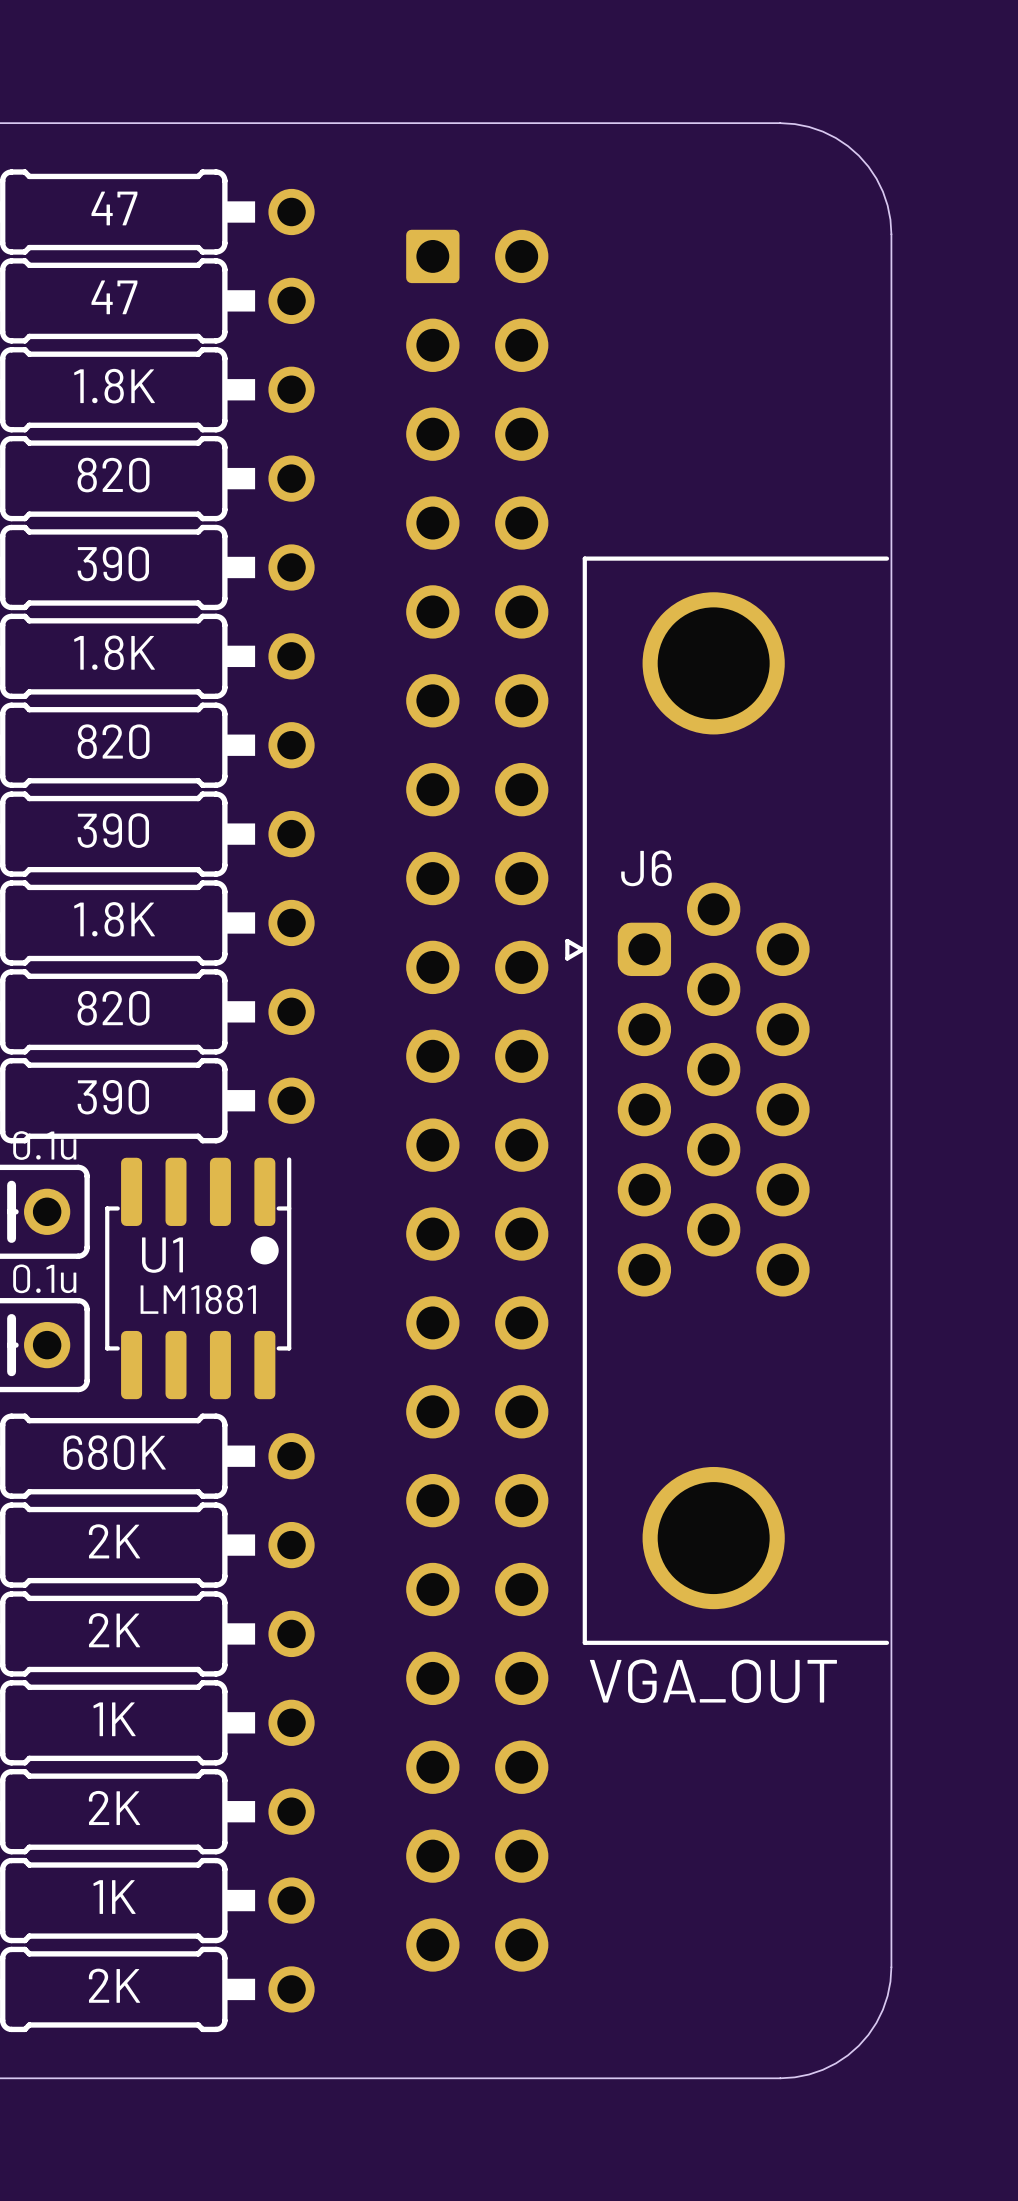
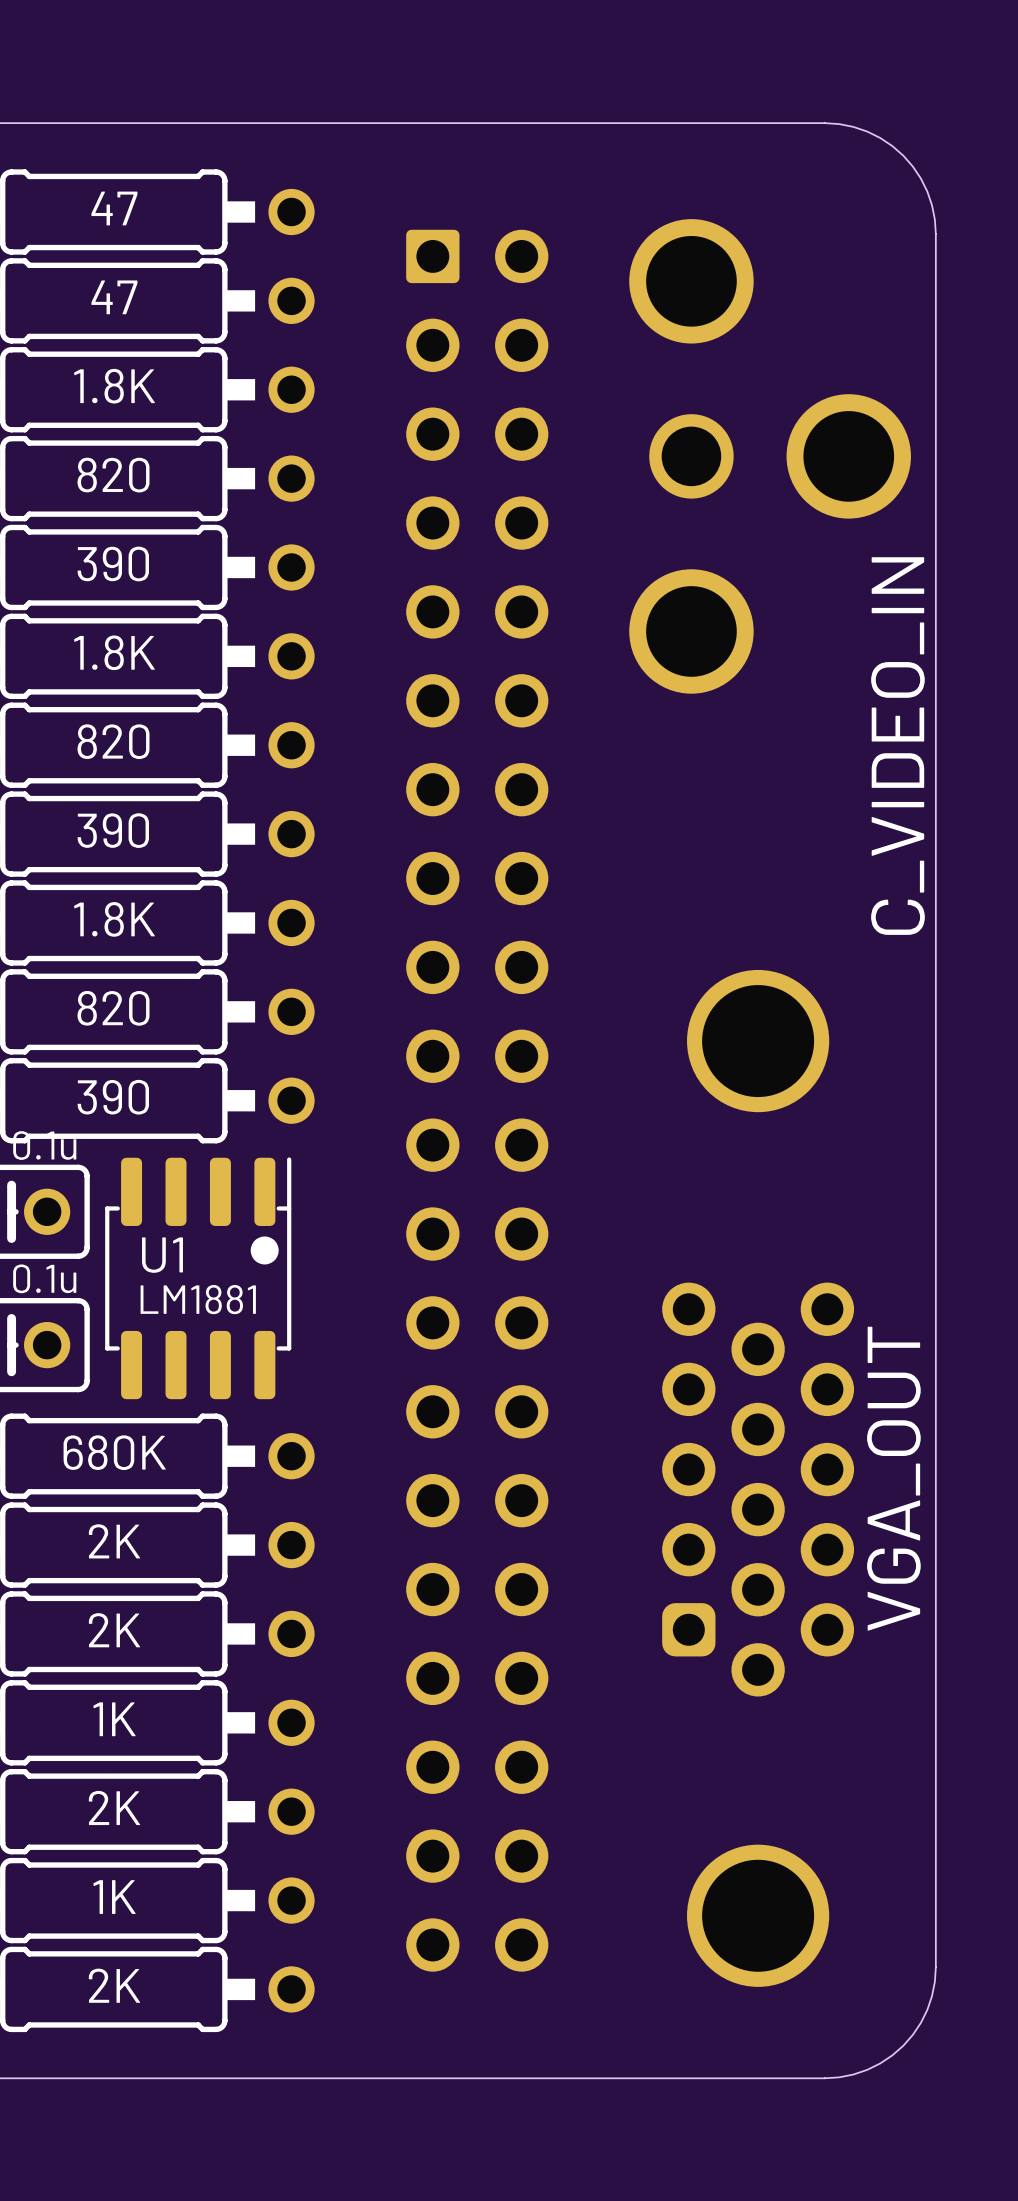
board edge: (780, 123) (809, 126) (822, 131) (835, 138) (858, 155) (876, 178) (882, 191) (887, 205) (891, 234) (891, 1967) -> (780, 123) (824, 123)
part: none -> C_VIDEO_IN (770, 456)
J6 side: top (727, 1100) -> bottom (758, 1478)
board edge: (891, 1967) (890, 1981) (882, 2009) (876, 2022) (858, 2045) (835, 2063) (822, 2069) (794, 2077) (780, 2078) -> (824, 123) (853, 126) (867, 131) (892, 146) (903, 155) (920, 178) (927, 191) (932, 205) (935, 234) (935, 1967) (932, 1995) (920, 2022) (903, 2045) (892, 2055) (867, 2069) (853, 2074) (824, 2078) (780, 2078)

